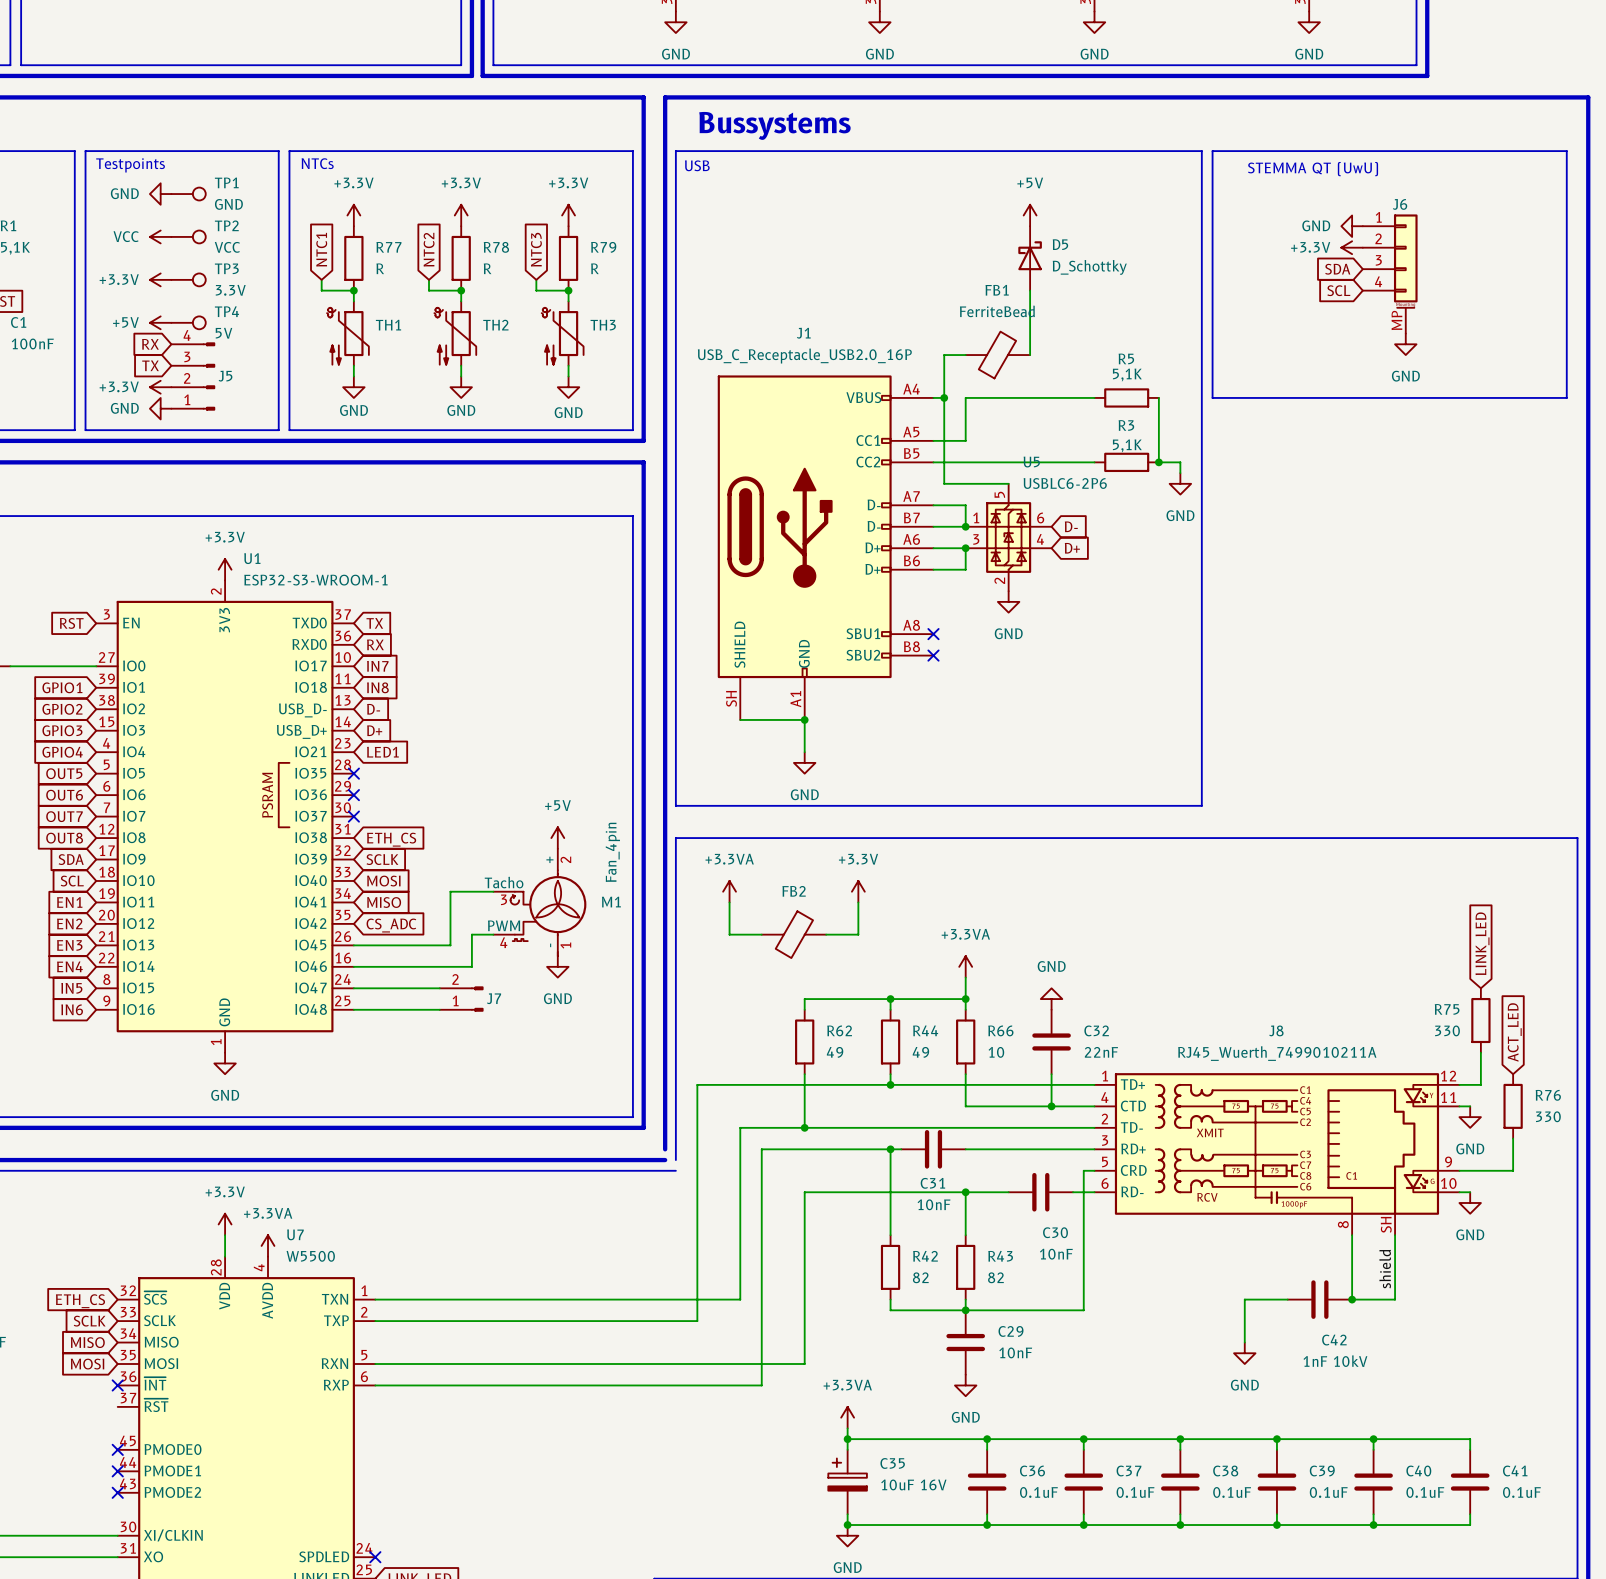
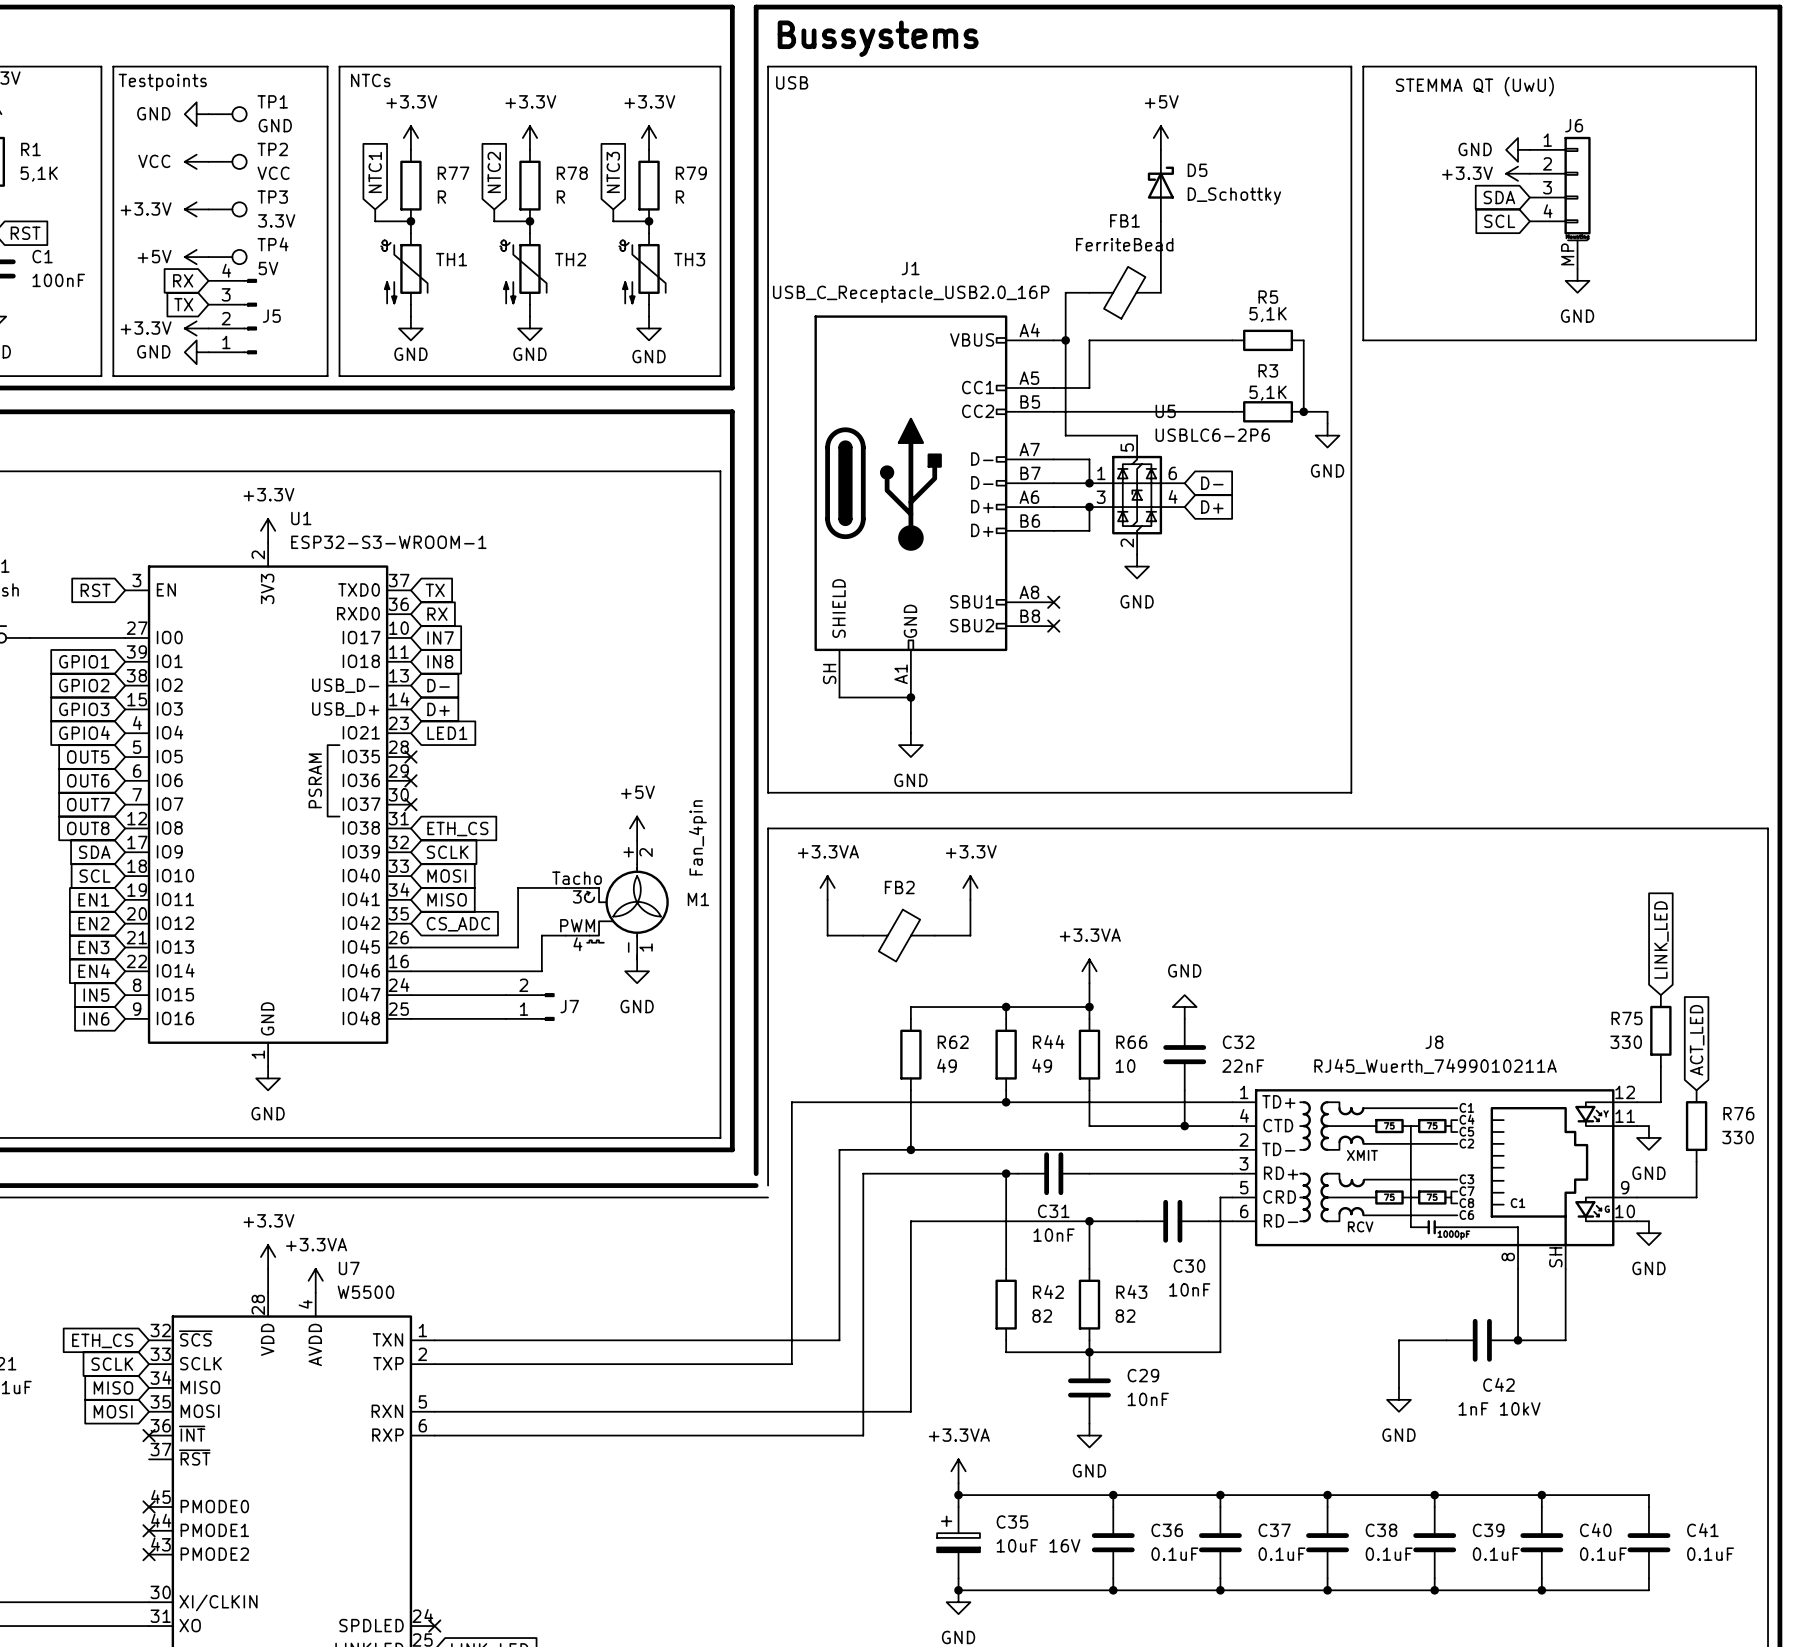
label: shield (1385, 1269) -> none

